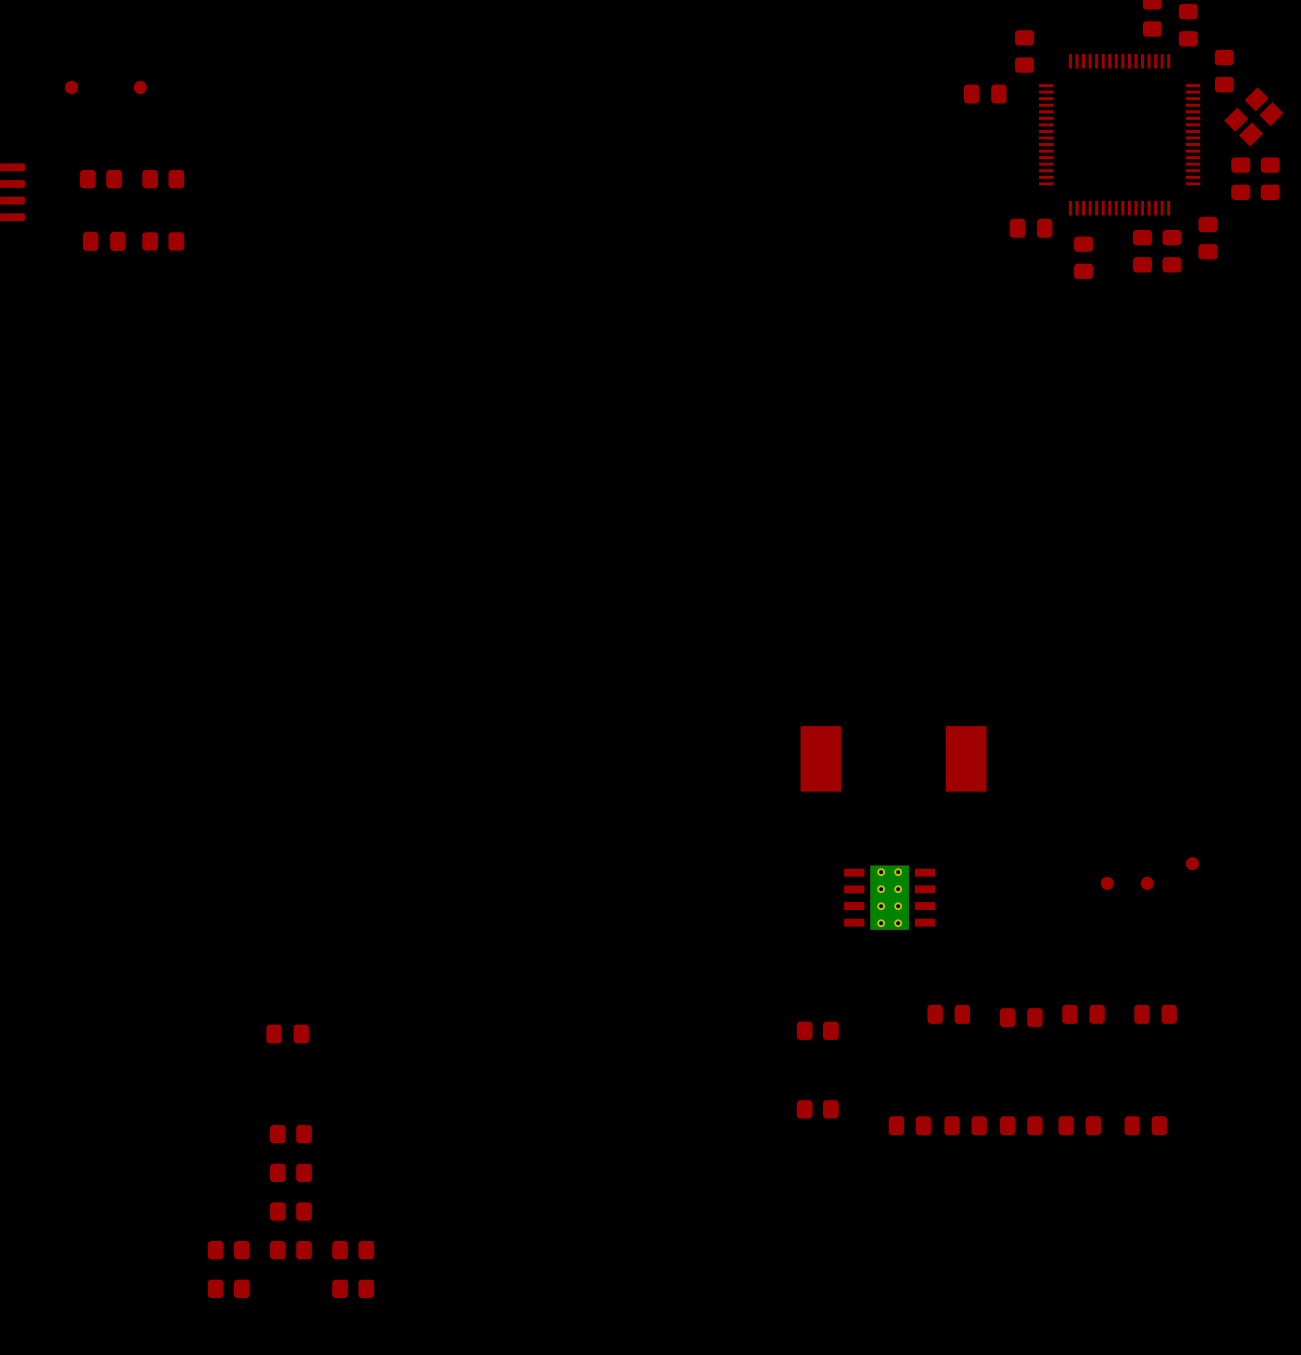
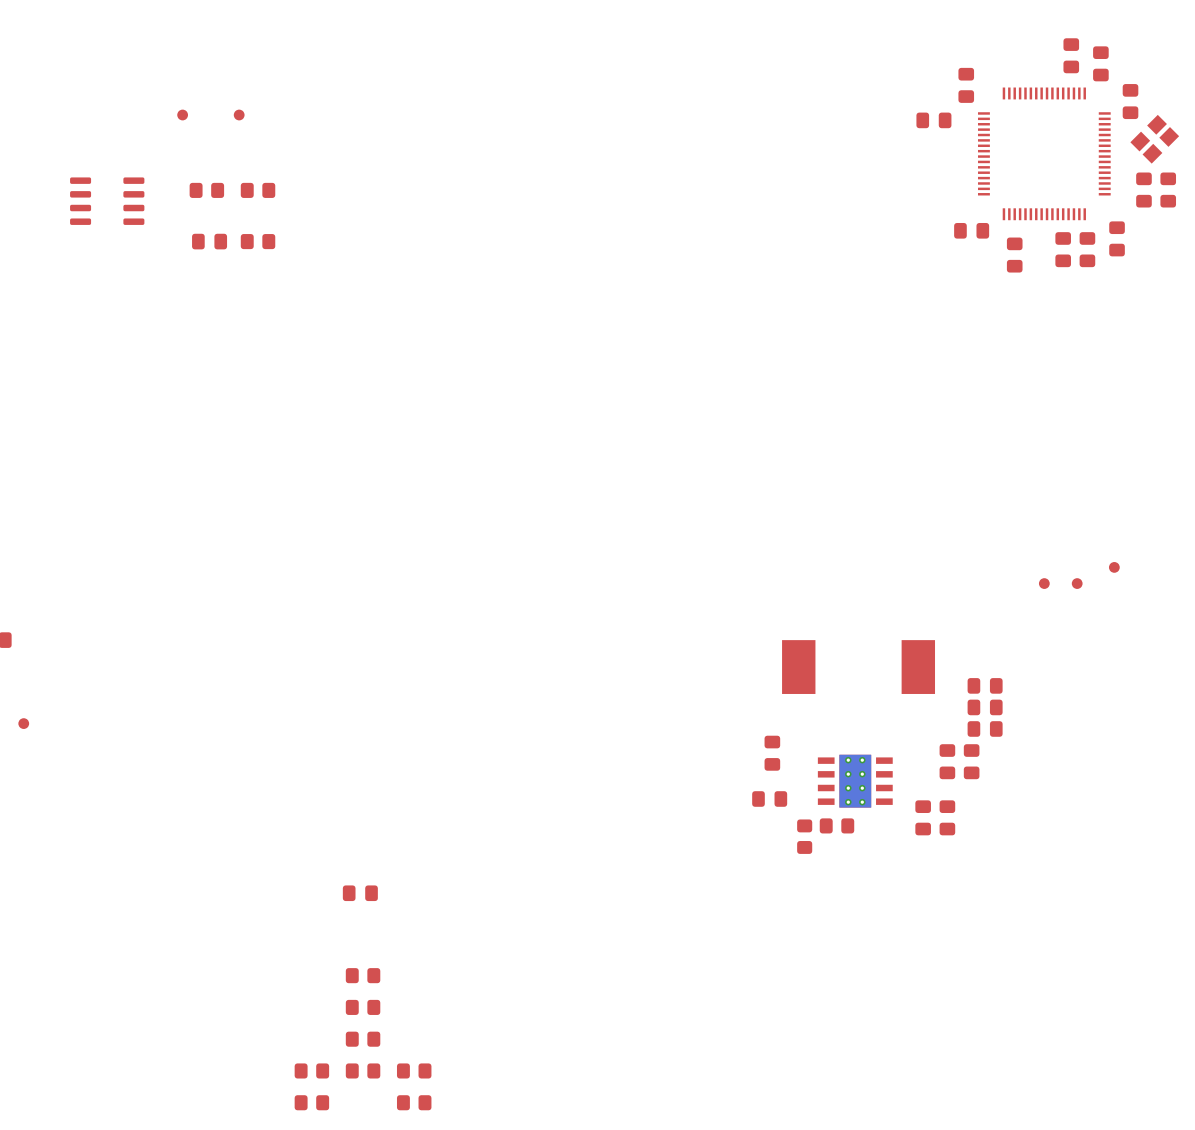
part: none -> (1114, 567)
part: none -> (1044, 583)
part: none -> (1077, 583)
part: none -> (985, 685)
part: none -> (985, 707)
part: none -> (985, 728)
part: none -> (772, 753)
part: (1192, 863) -> none
part: none -> (947, 761)
part: none -> (971, 761)
part: (1107, 883) -> none
part: (1147, 883) -> none
part: none -> (769, 798)
part: none -> (923, 817)
part: none -> (947, 817)
part: none -> (836, 825)
part: none -> (804, 836)
part: (948, 1014) -> none
part: (1083, 1014) -> none
part: (1155, 1014) -> none
part: (1021, 1017) -> none
part: (817, 1030) -> none
part: (817, 1109) -> none
part: (909, 1125) -> none
part: (965, 1125) -> none
part: (1021, 1125) -> none
part: (1079, 1125) -> none
part: (1145, 1125) -> none

